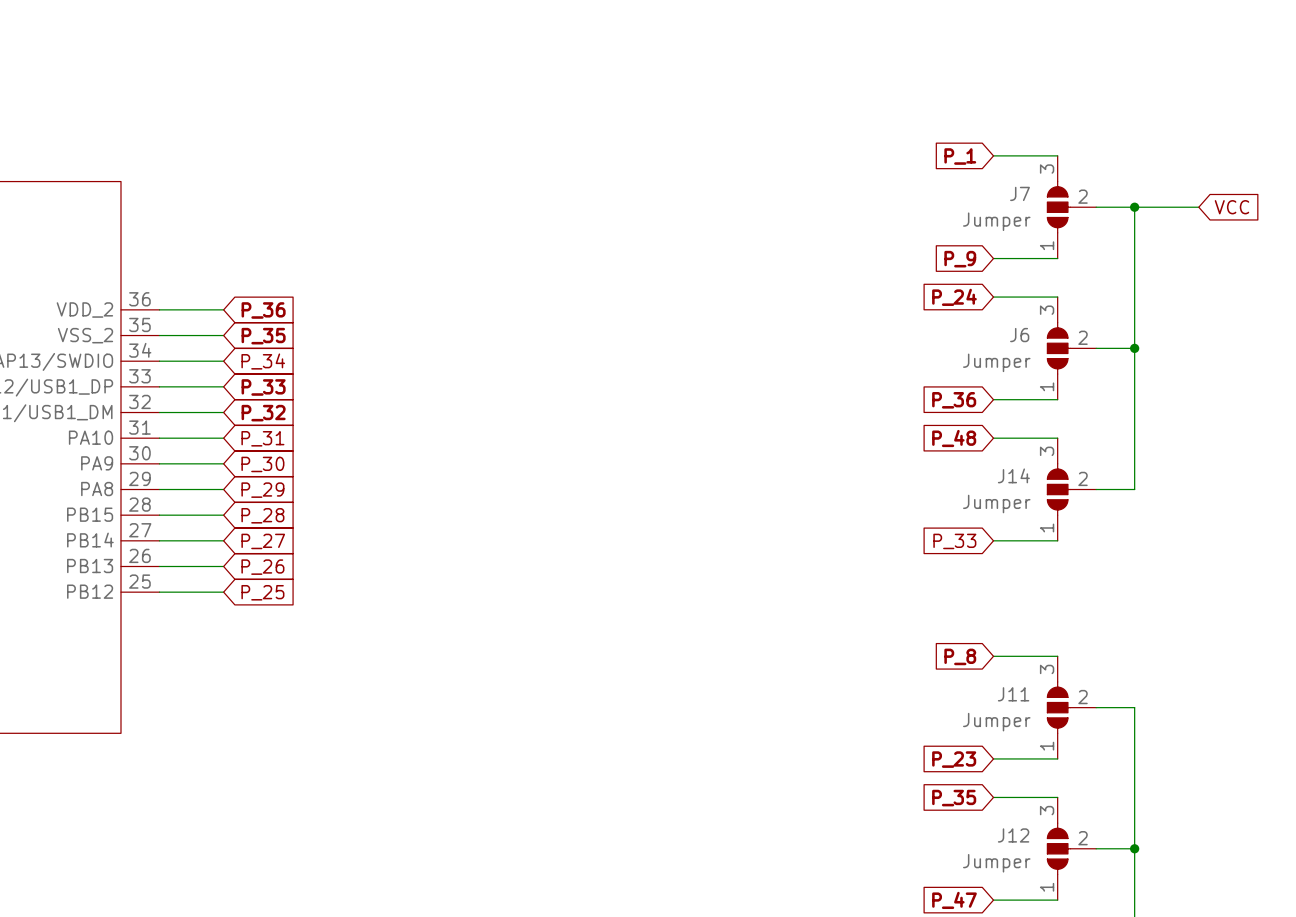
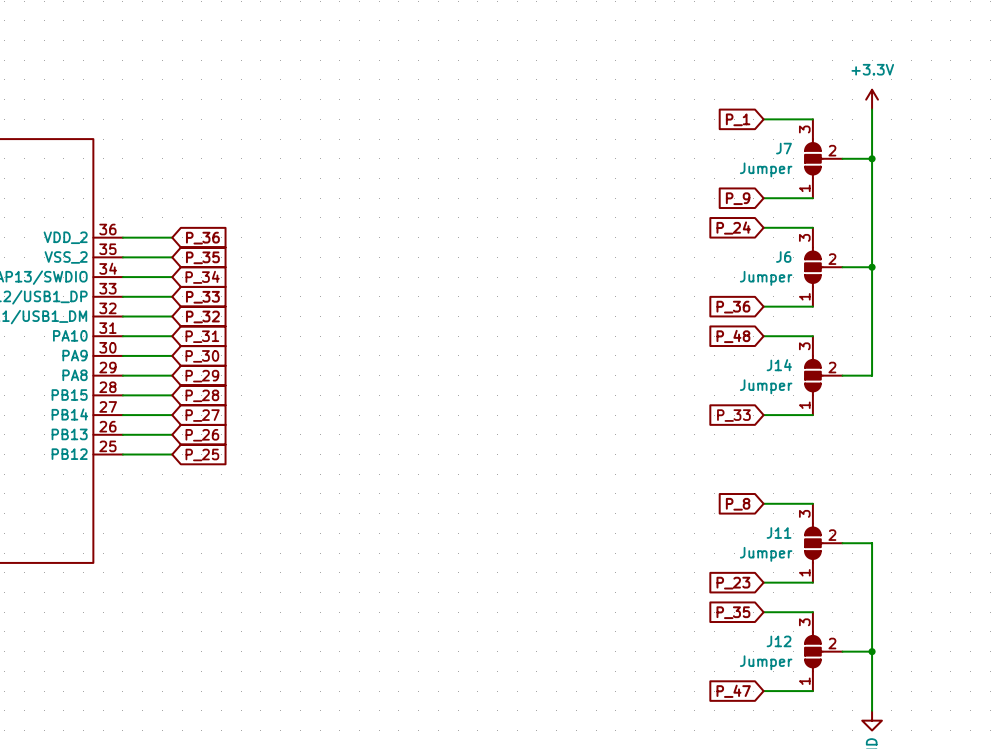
power symbol: none -> +3.3V (872, 99)
wire: (1134, 207) (1198, 207) -> (872, 158) (872, 109)
global label: VCC (1231, 207) -> none

